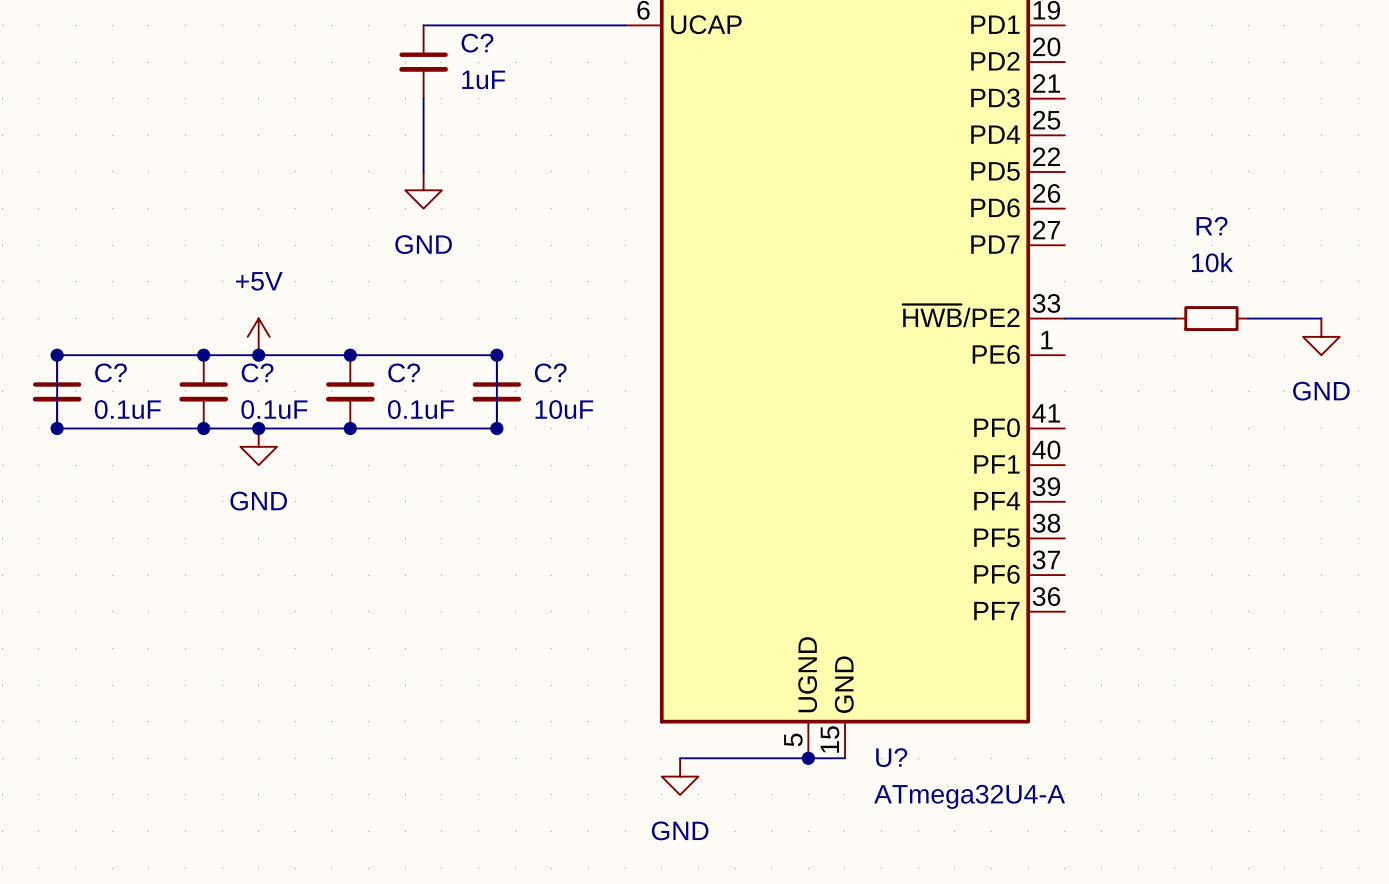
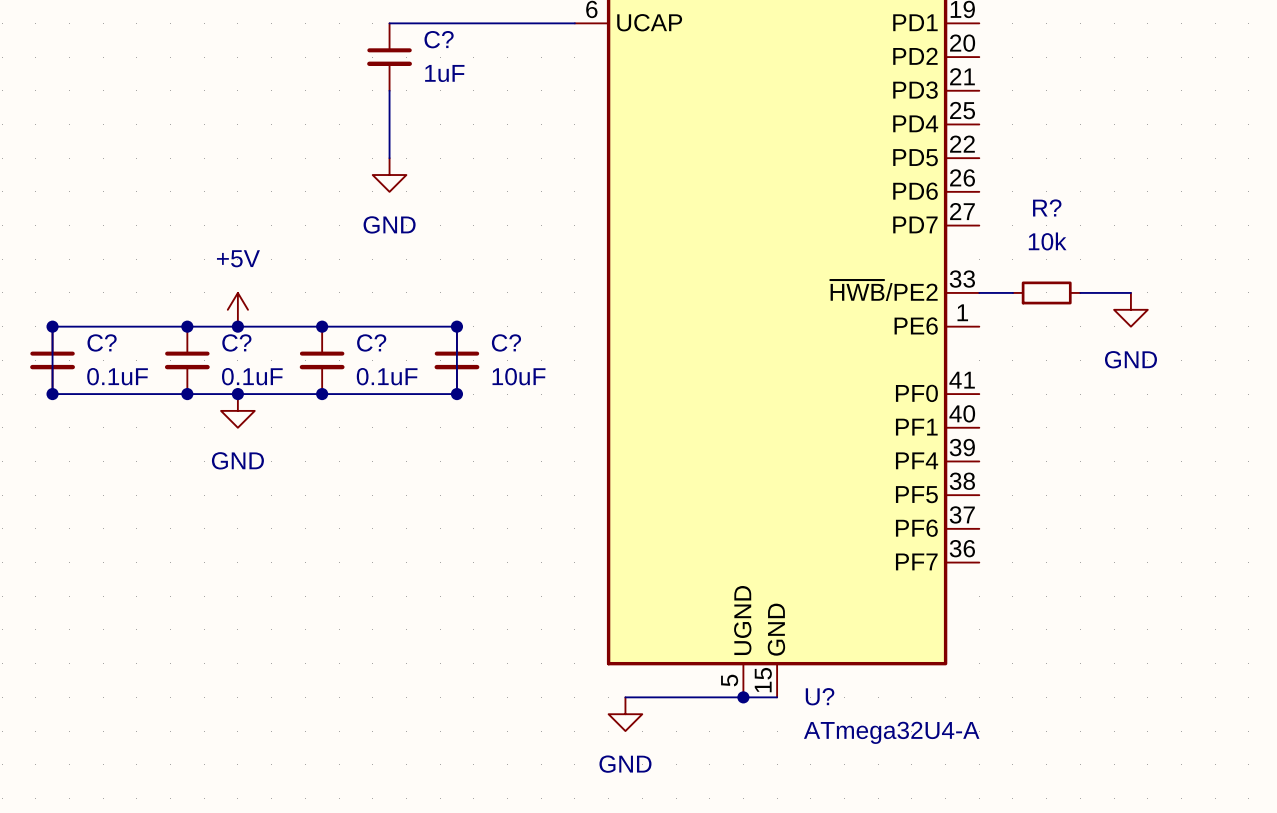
wire: (1101, 318) (1174, 318) -> (1130, 292) (1080, 292)
R? position: (1211, 318) -> (1046, 292)
wire: (1248, 318) (1321, 318) -> none
power symbol position: GND (1321, 336) -> GND (1130, 309)

